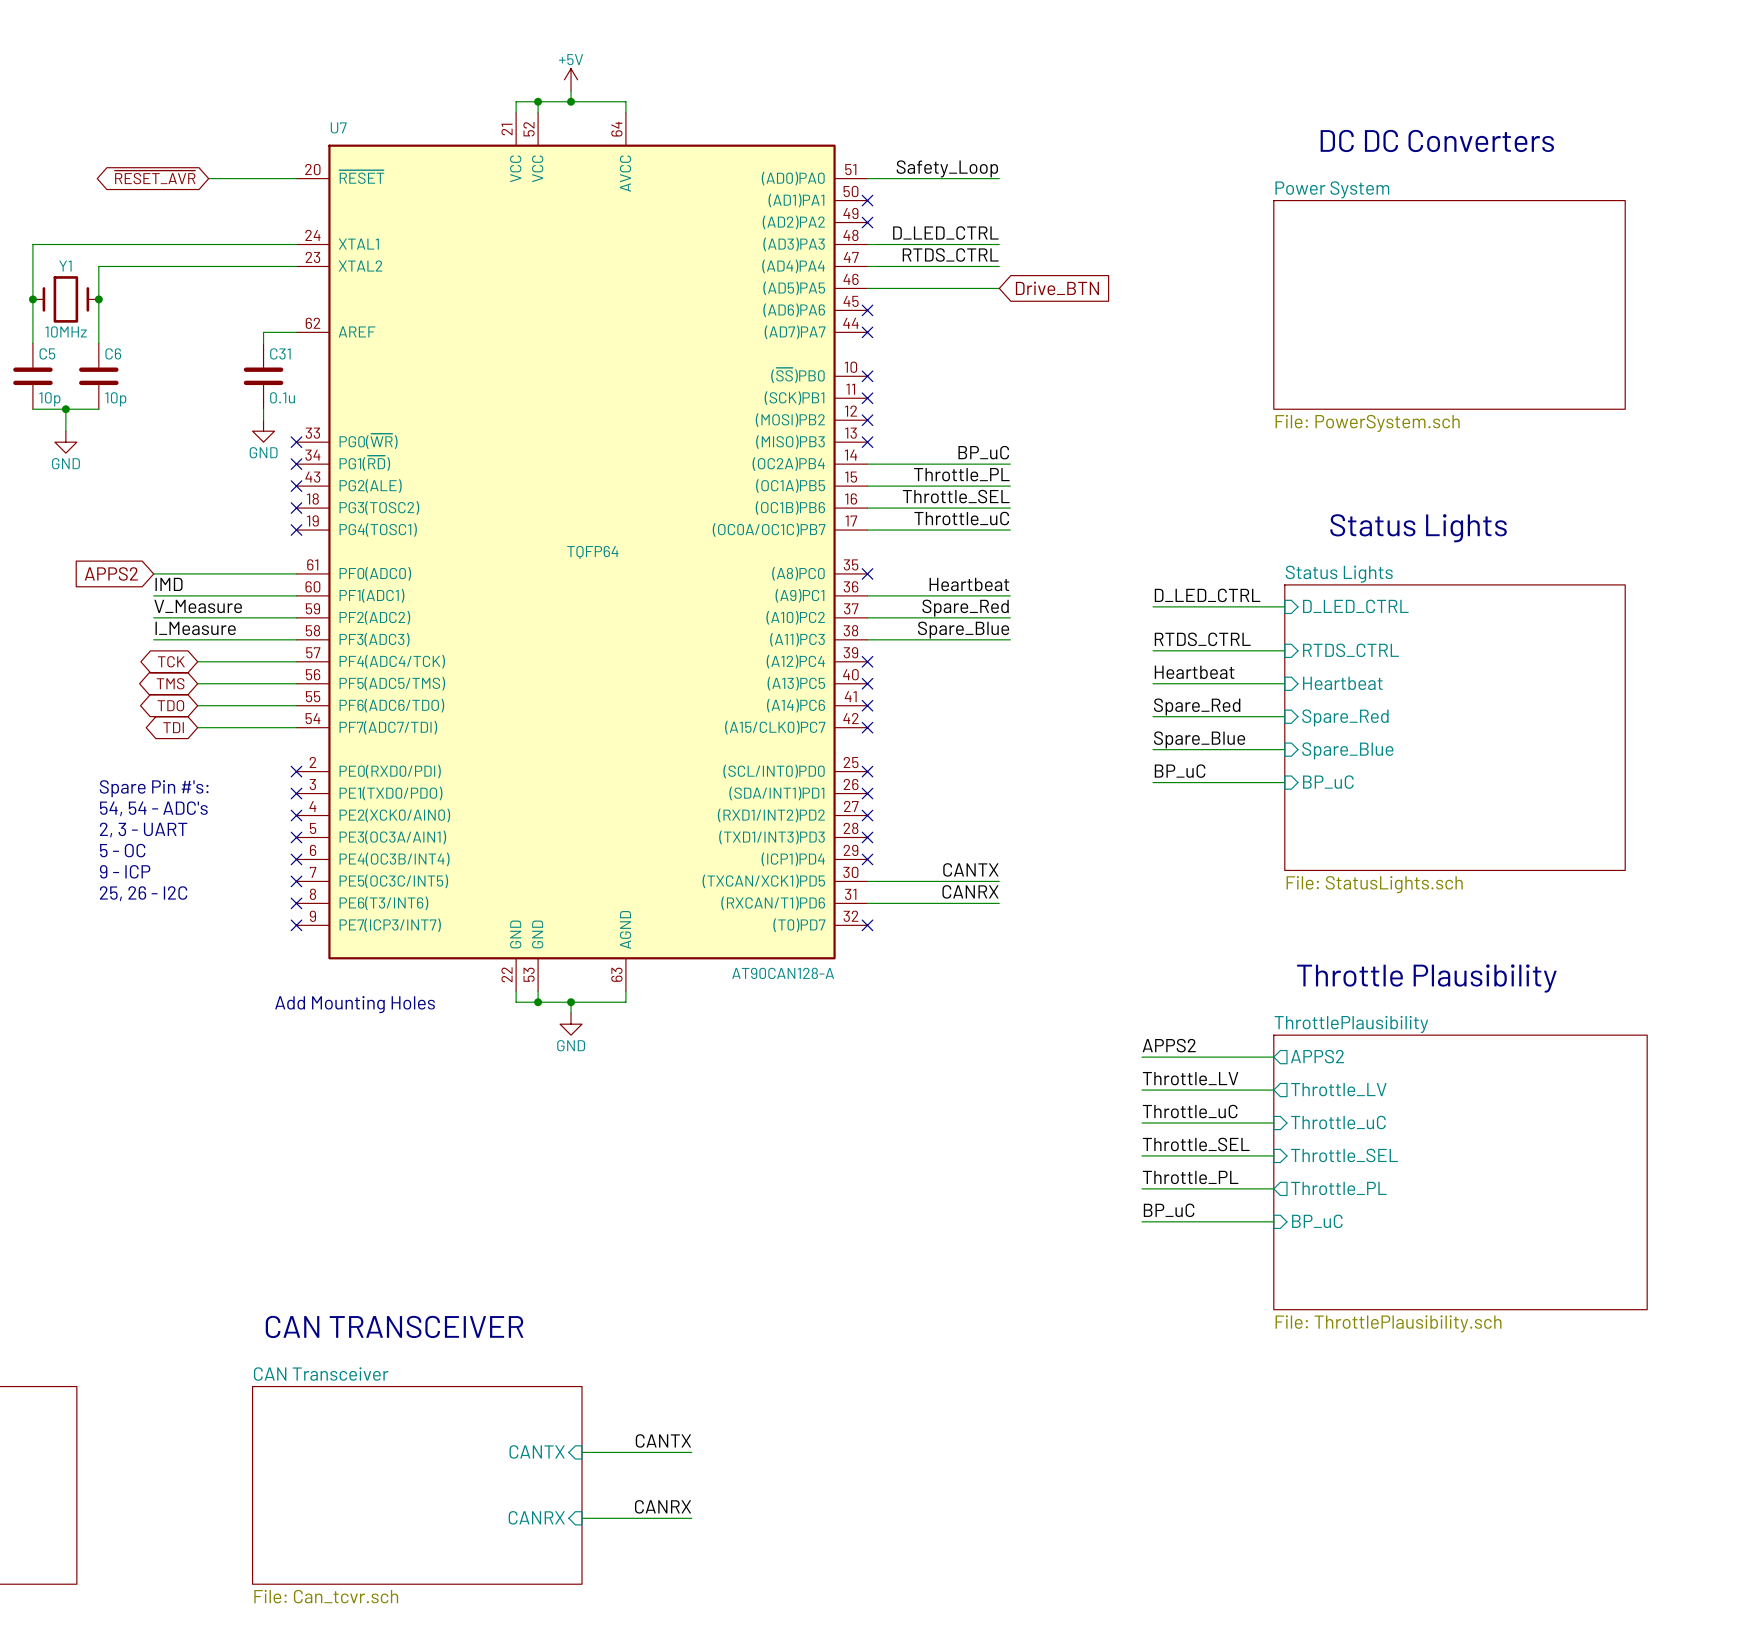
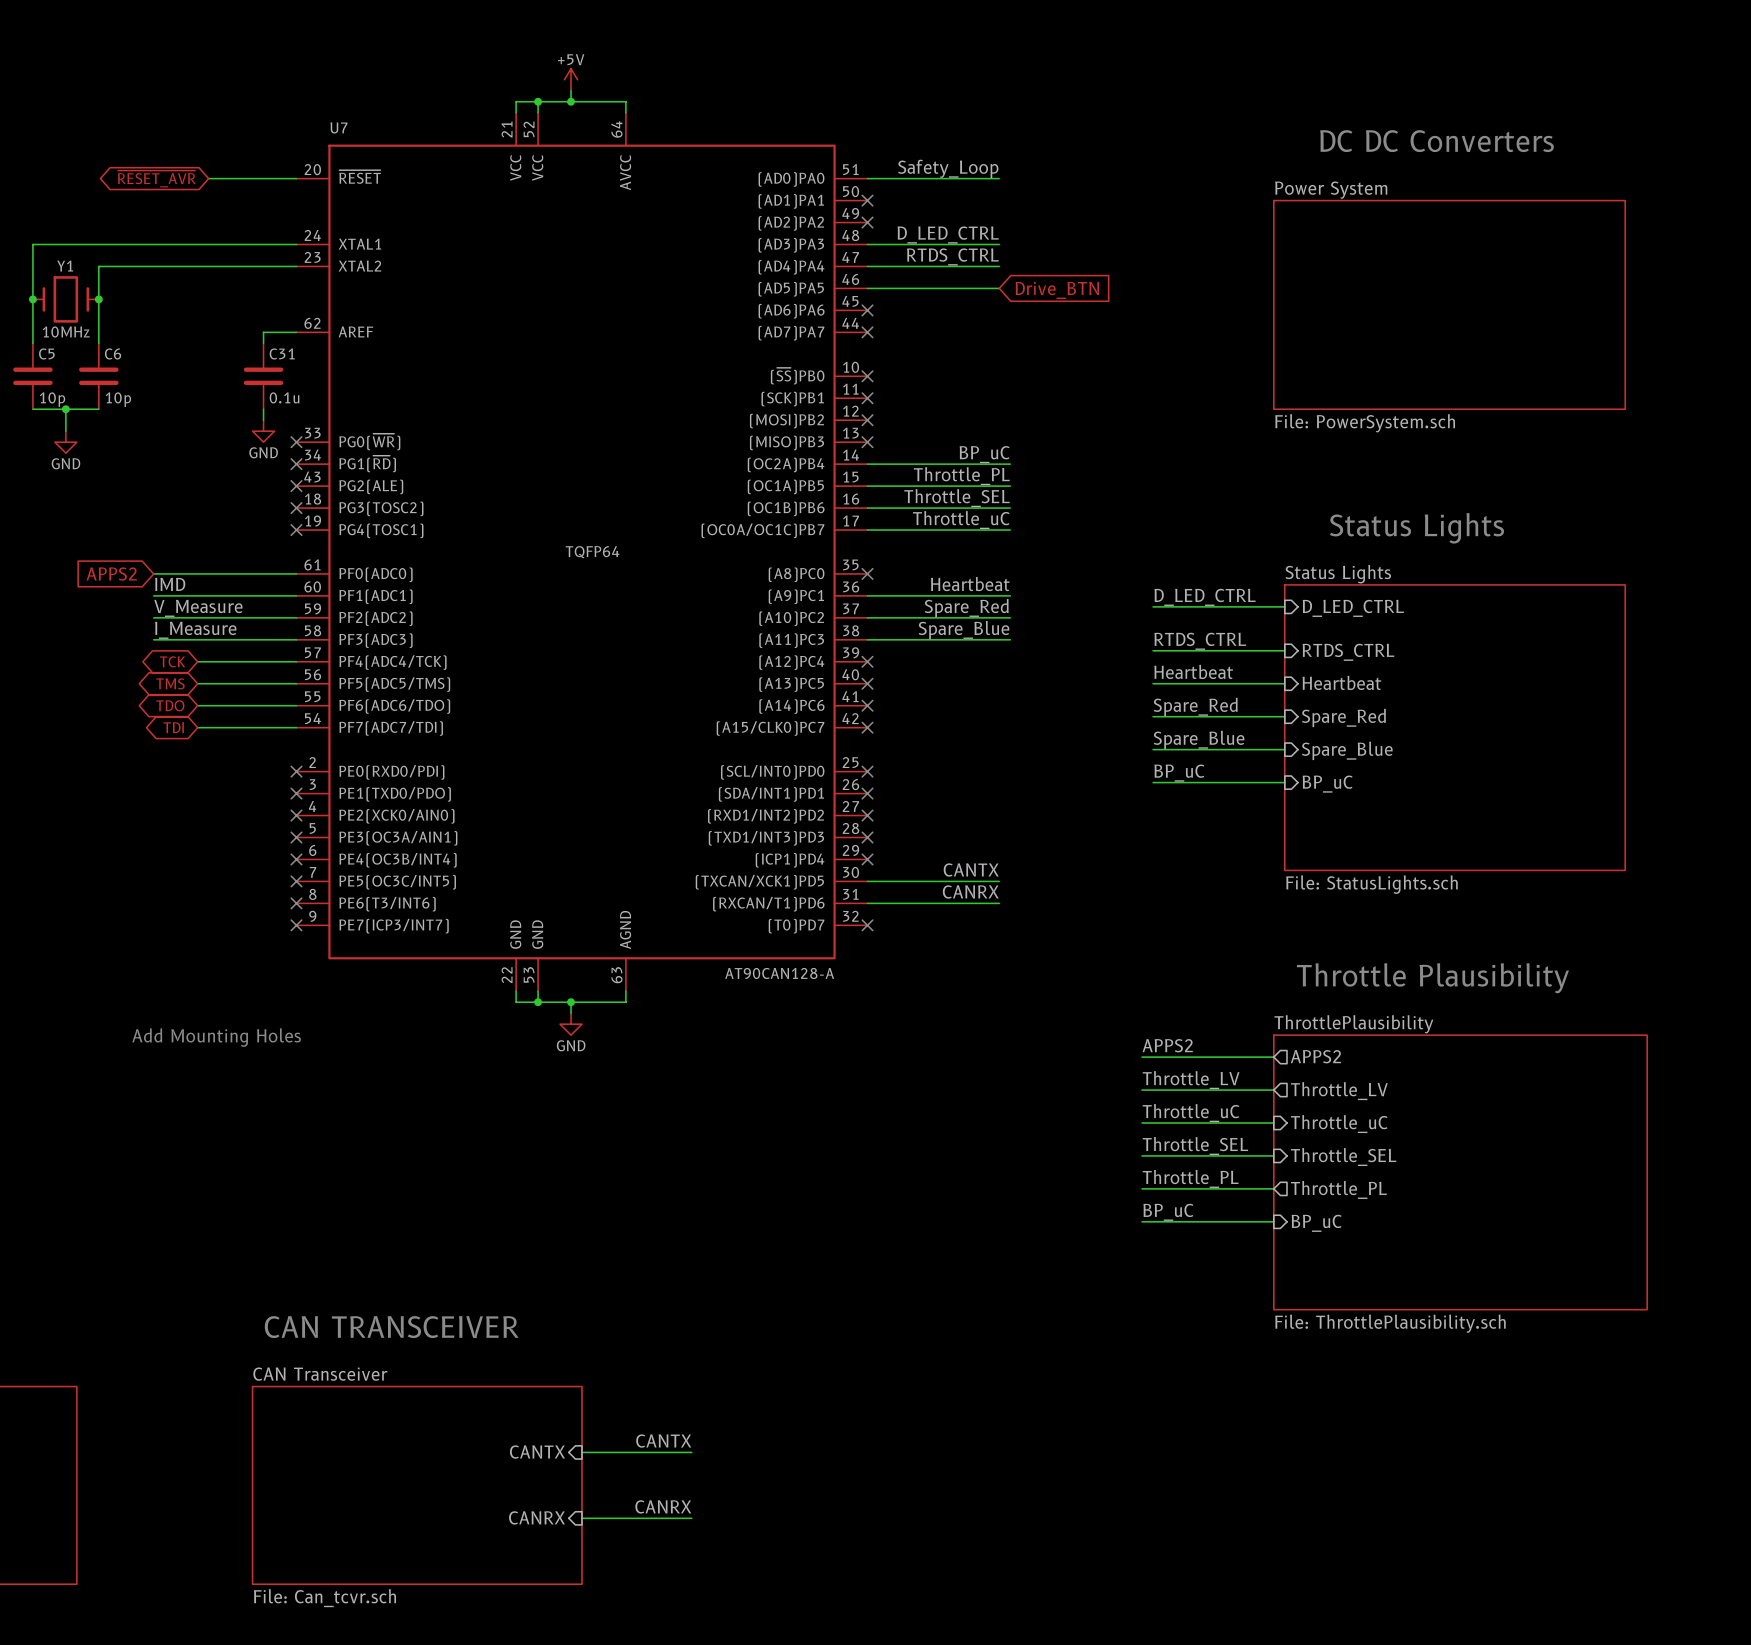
text: Spare Pin #'s: (154, 788) -> none
text: 54, 54 - ADC's (153, 808) -> none
text: 2, 3 - UART (143, 830) -> none
text: 5 - OC (122, 850) -> none
text: 9 - ICP (125, 871) -> none
text: 25, 26 - I2C (143, 893) -> none
text position: Add Mounting Holes (355, 1004) -> Add Mounting Holes (216, 1037)

